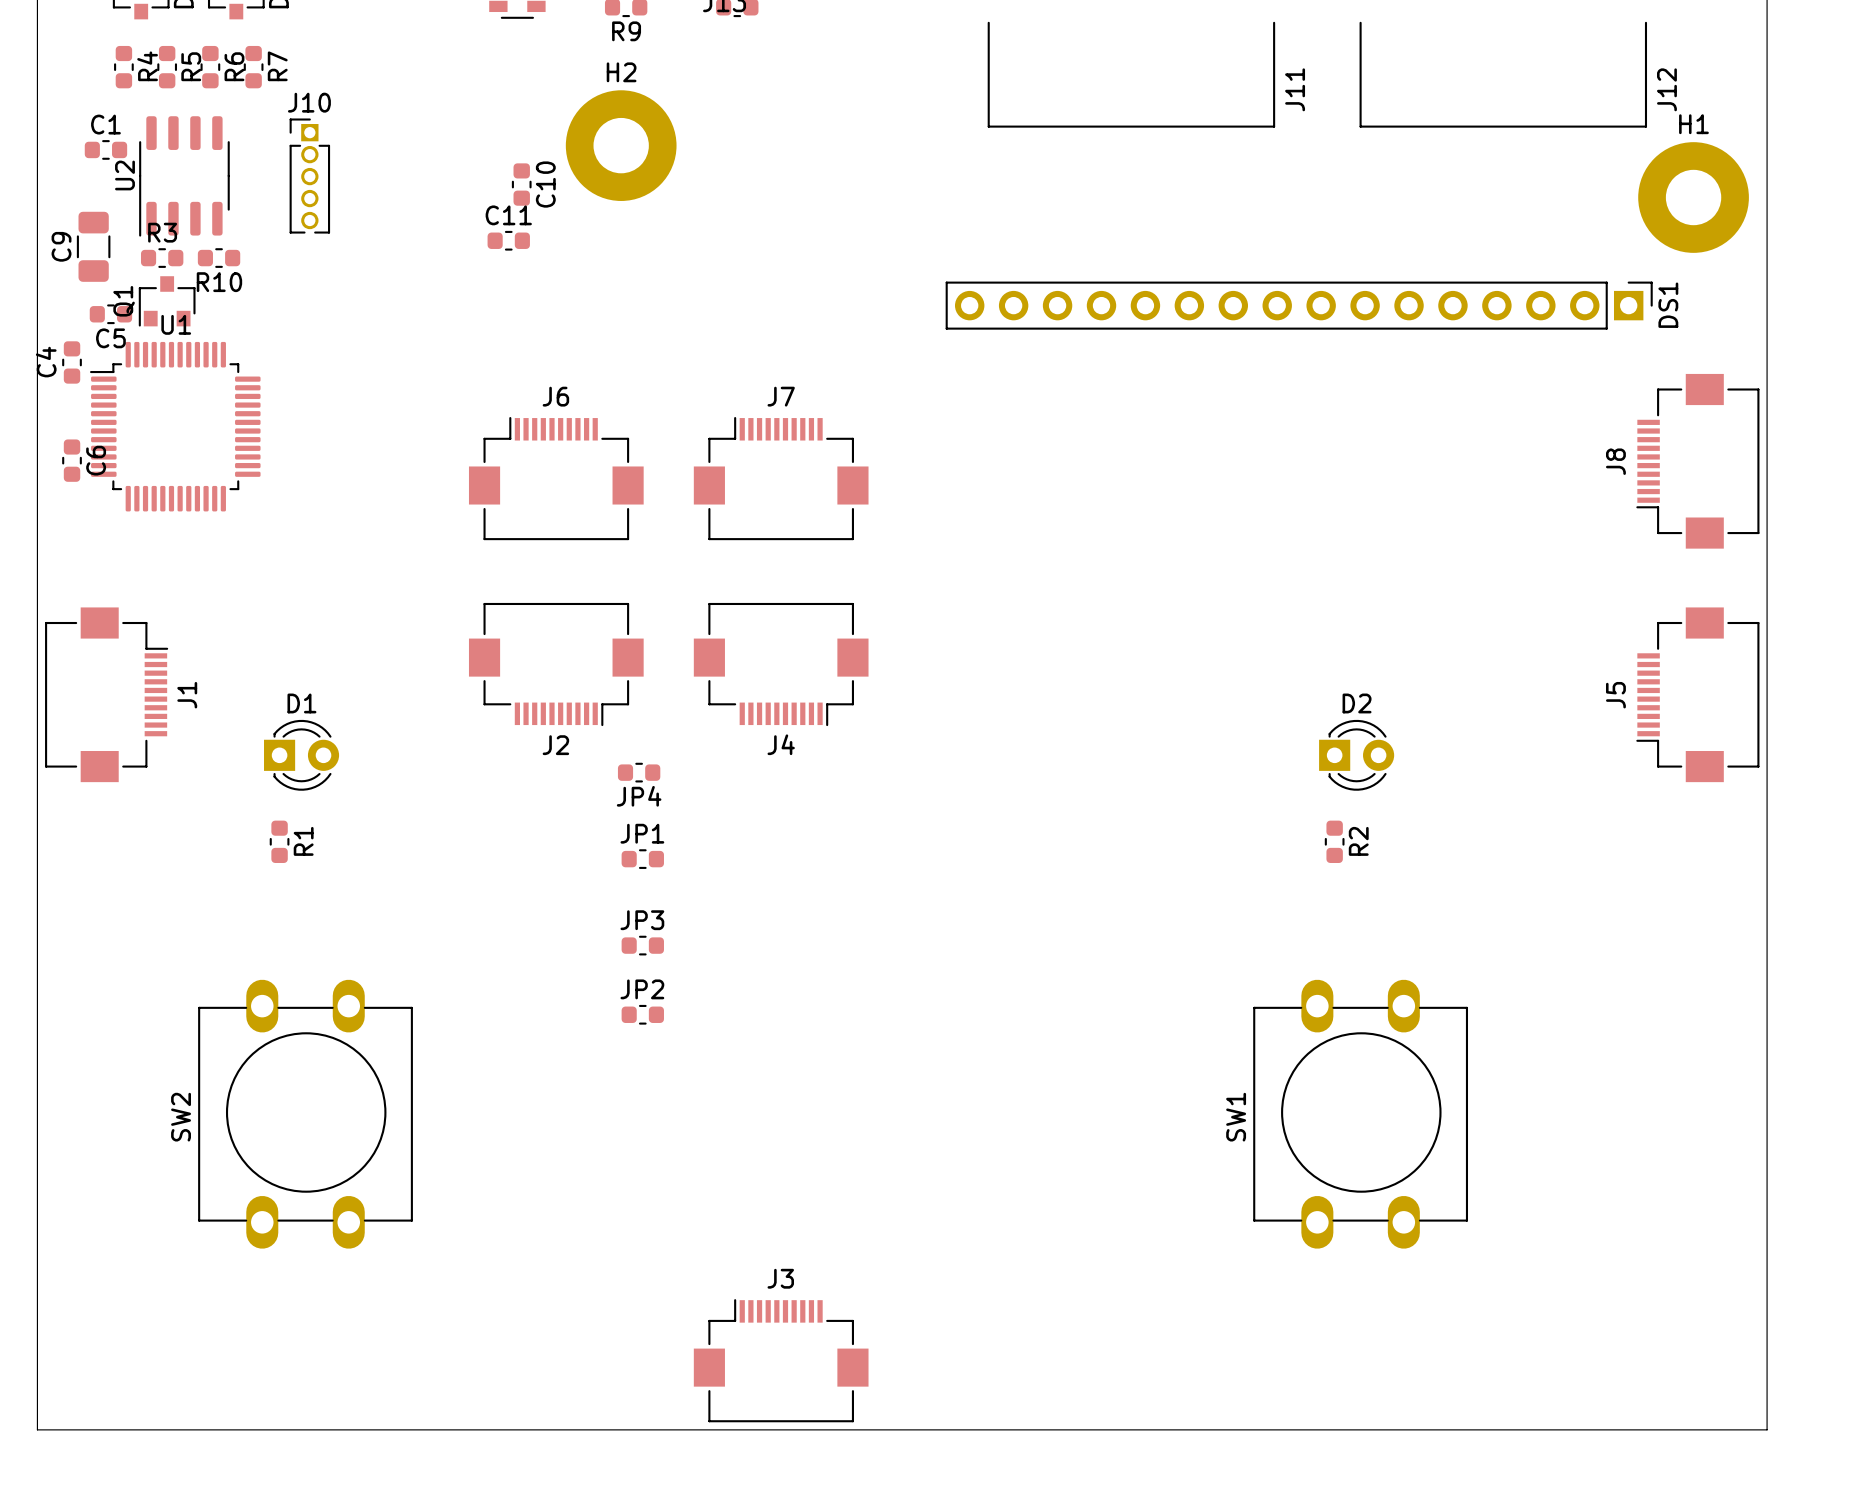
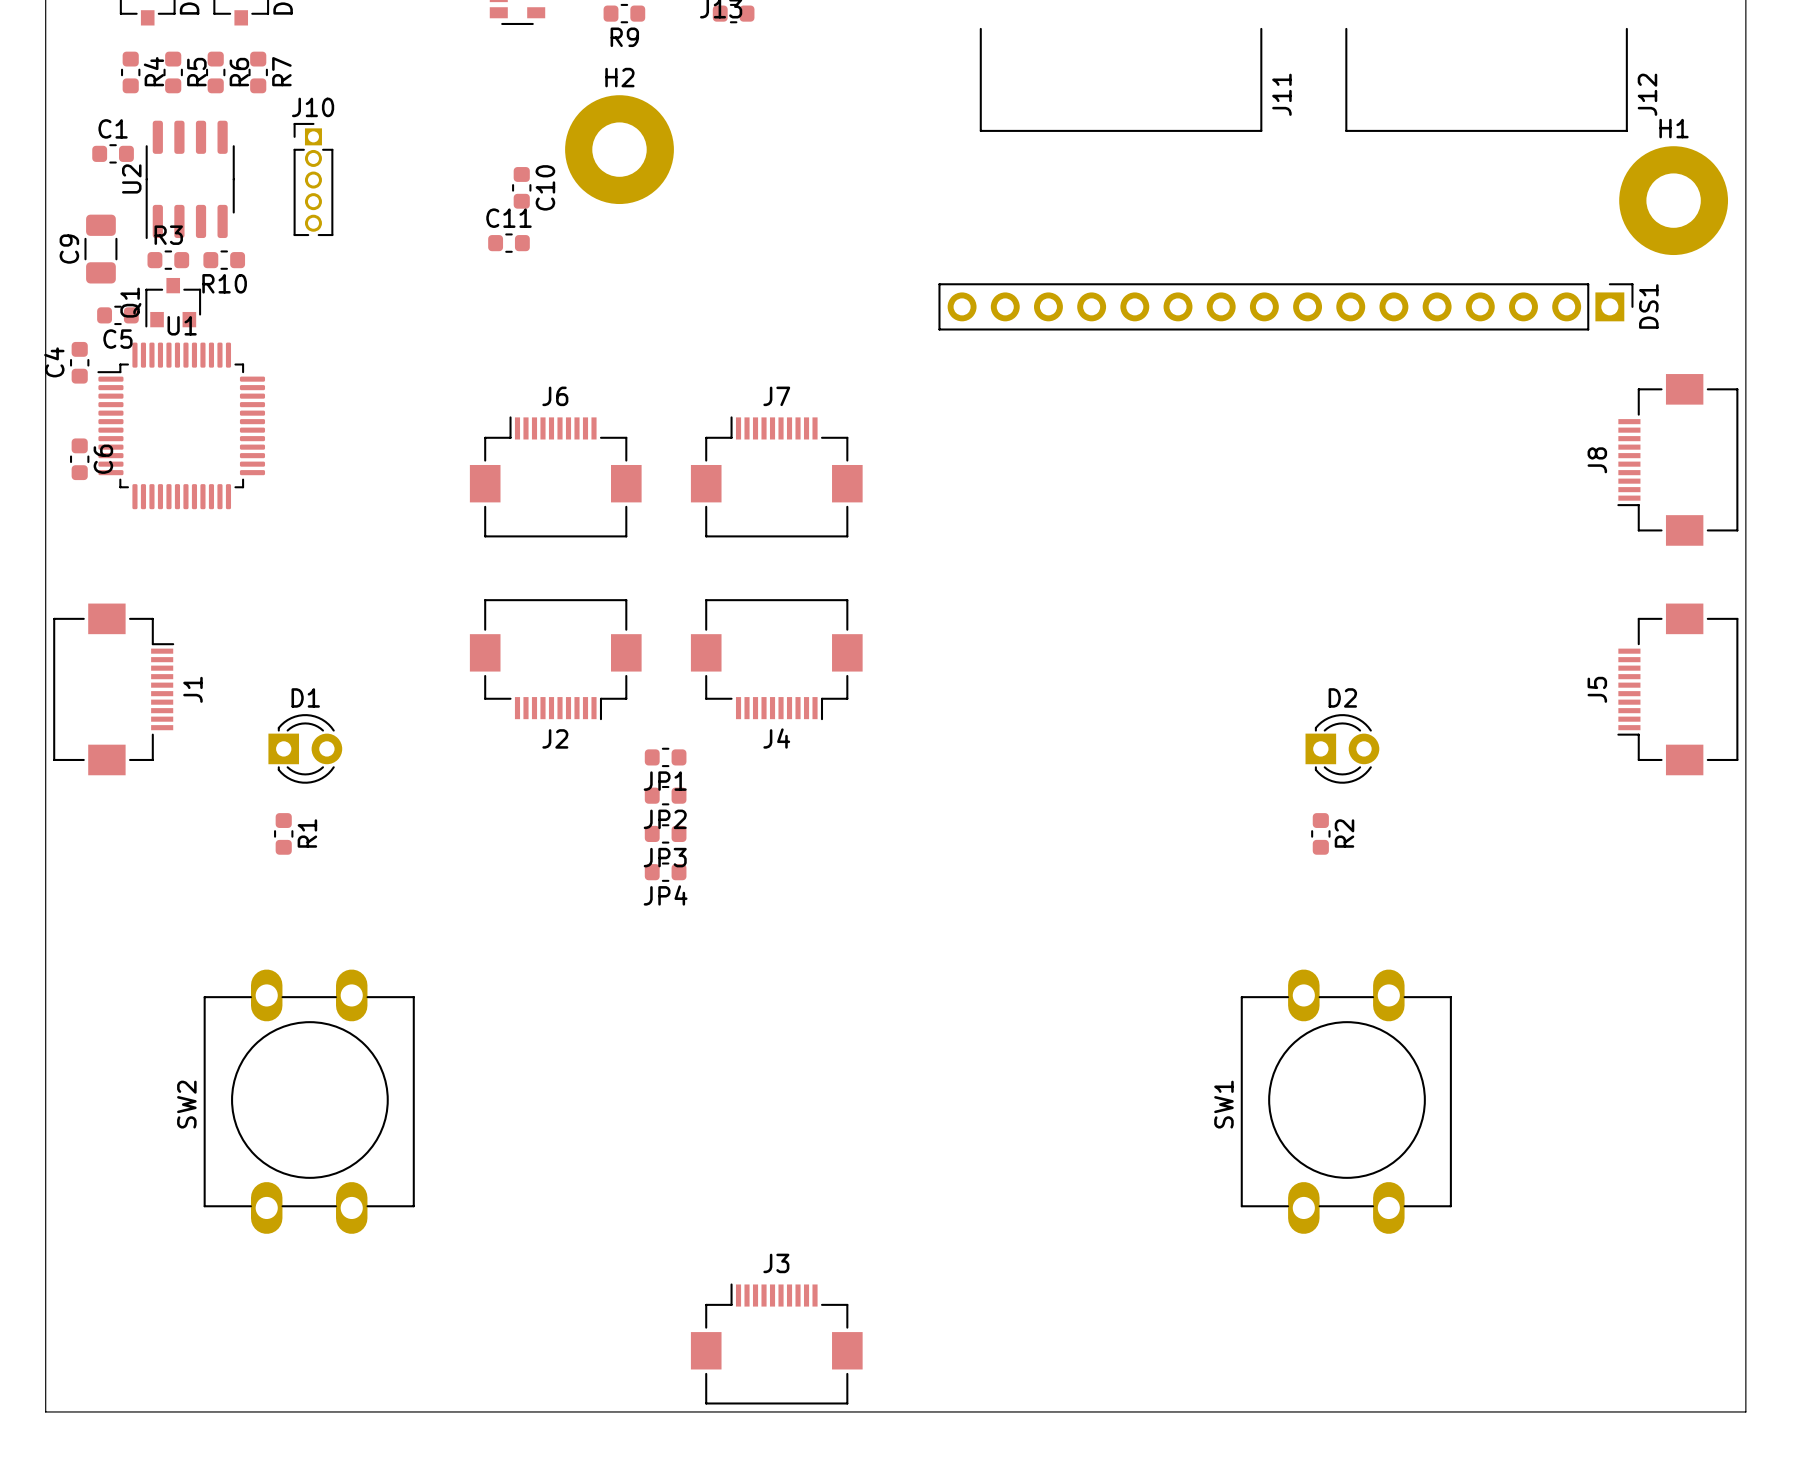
JP4 position: (639, 772) -> (665, 872)
JP1 name position: JP1 (642, 833) -> JP1 (665, 781)
JP1 position: (642, 859) -> (665, 757)
JP3 name position: JP3 (642, 920) -> JP3 (665, 857)
JP3 position: (642, 945) -> (665, 833)
JP2 name position: JP2 (642, 989) -> JP2 (665, 819)
JP2 position: (642, 1014) -> (665, 795)

